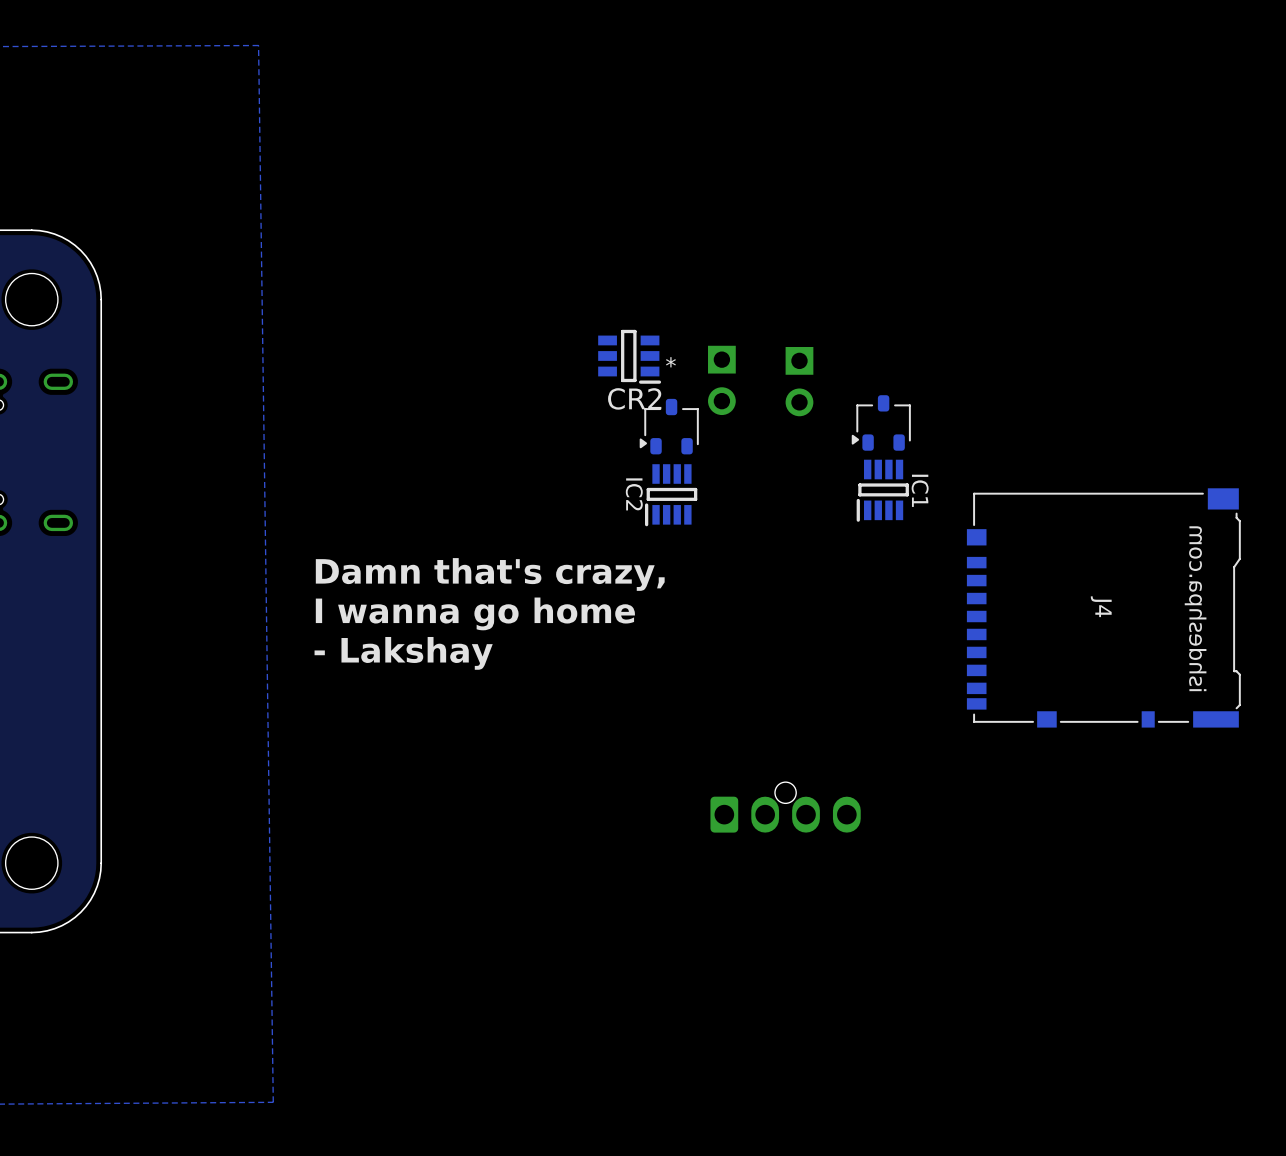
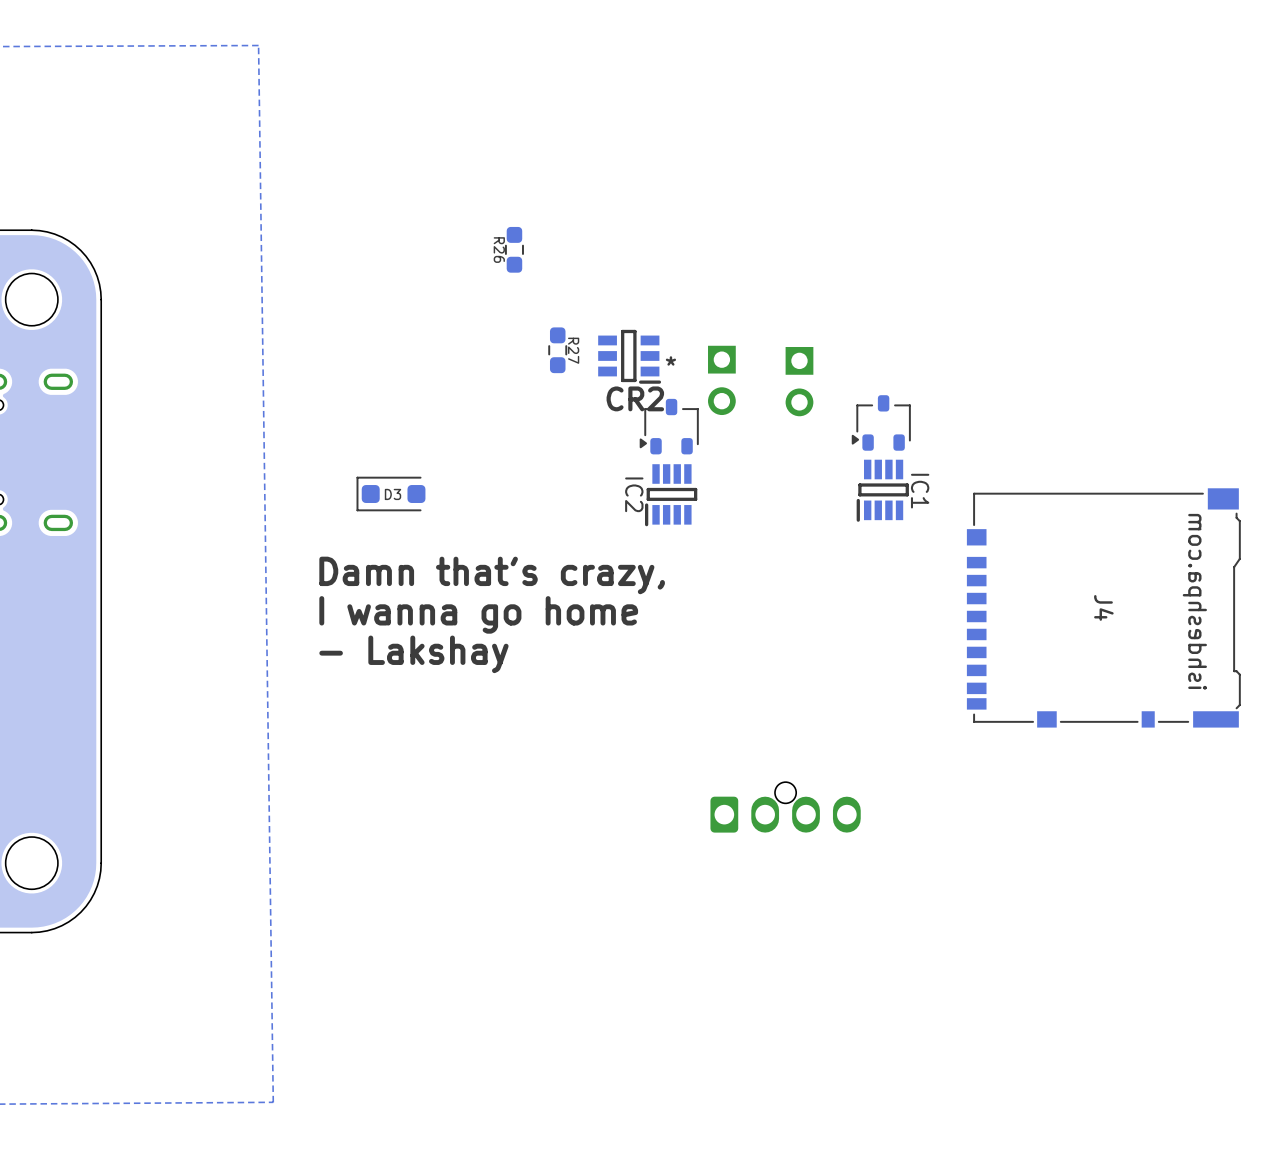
R26: none -> (514, 249)
R27: none -> (557, 350)
D3: none -> (390, 494)

